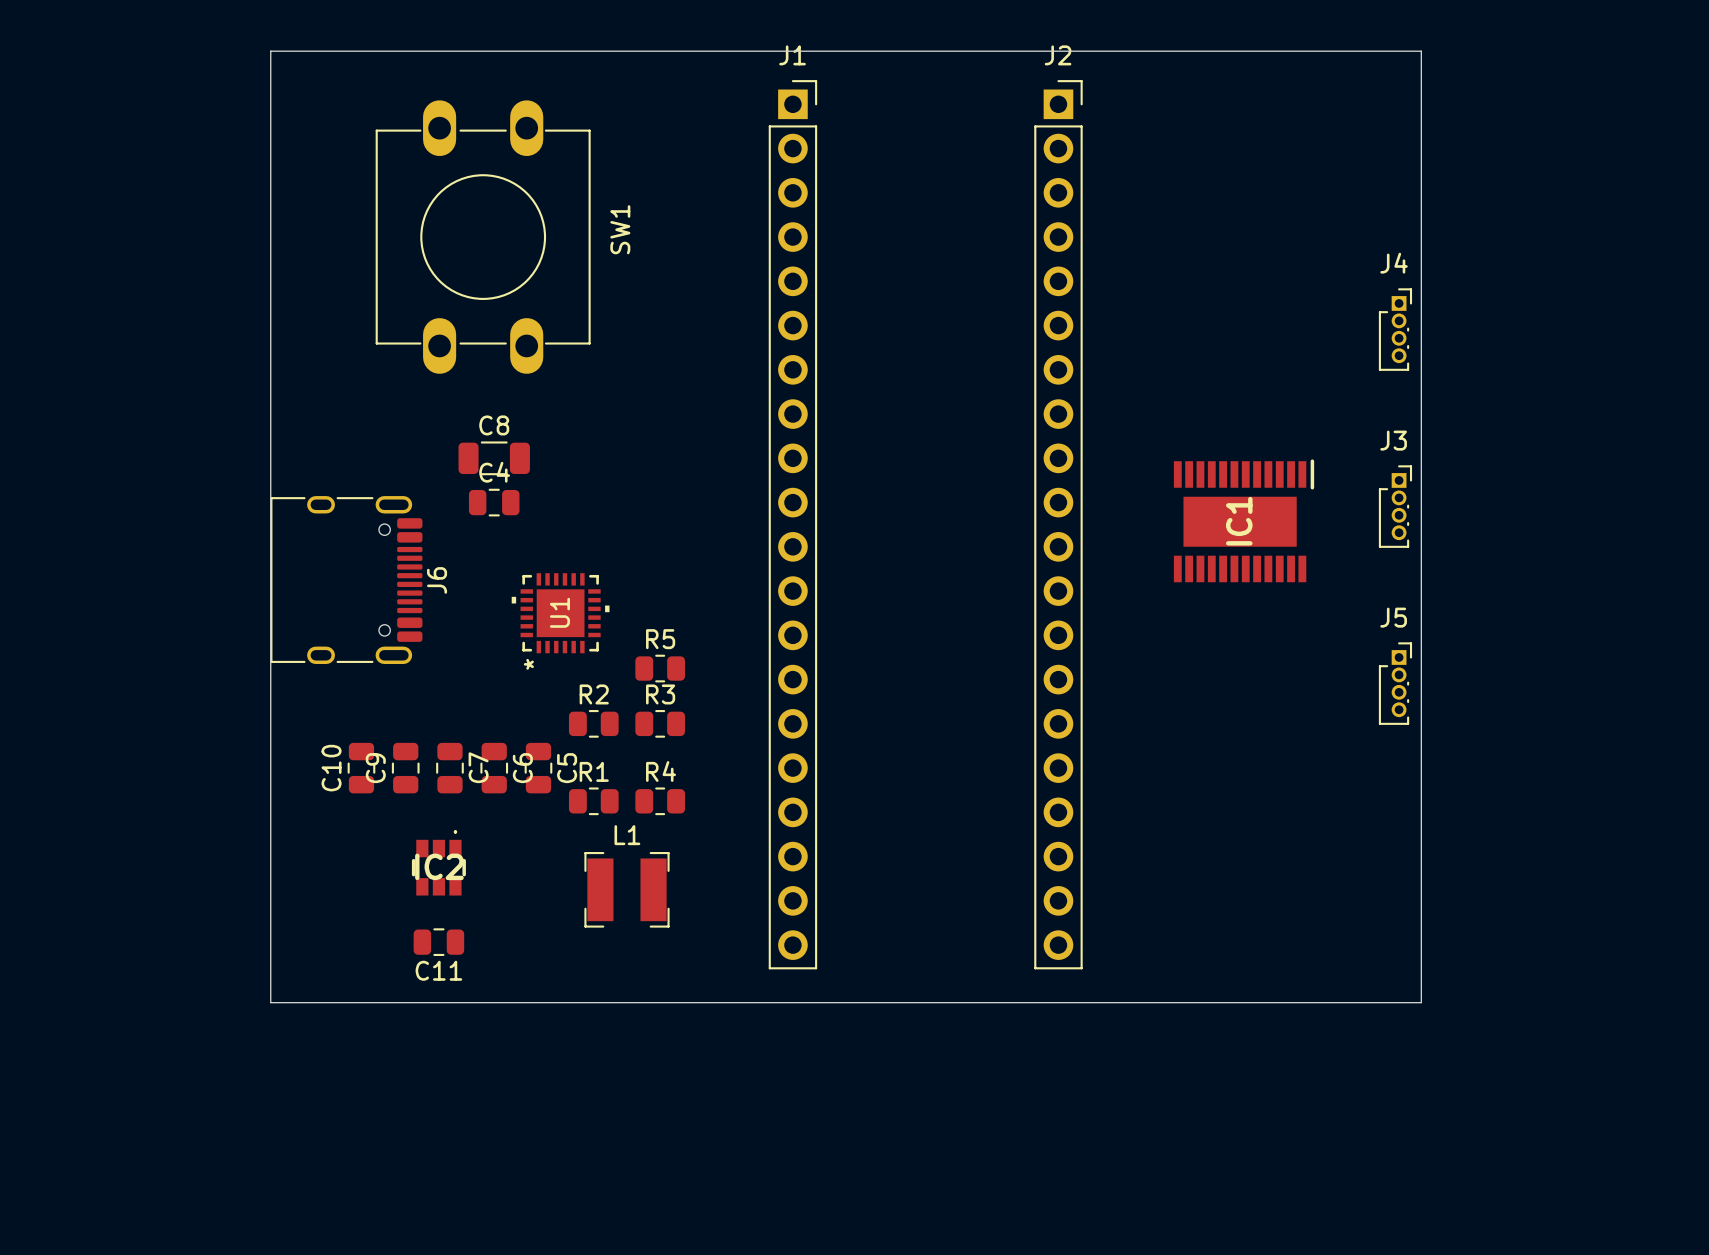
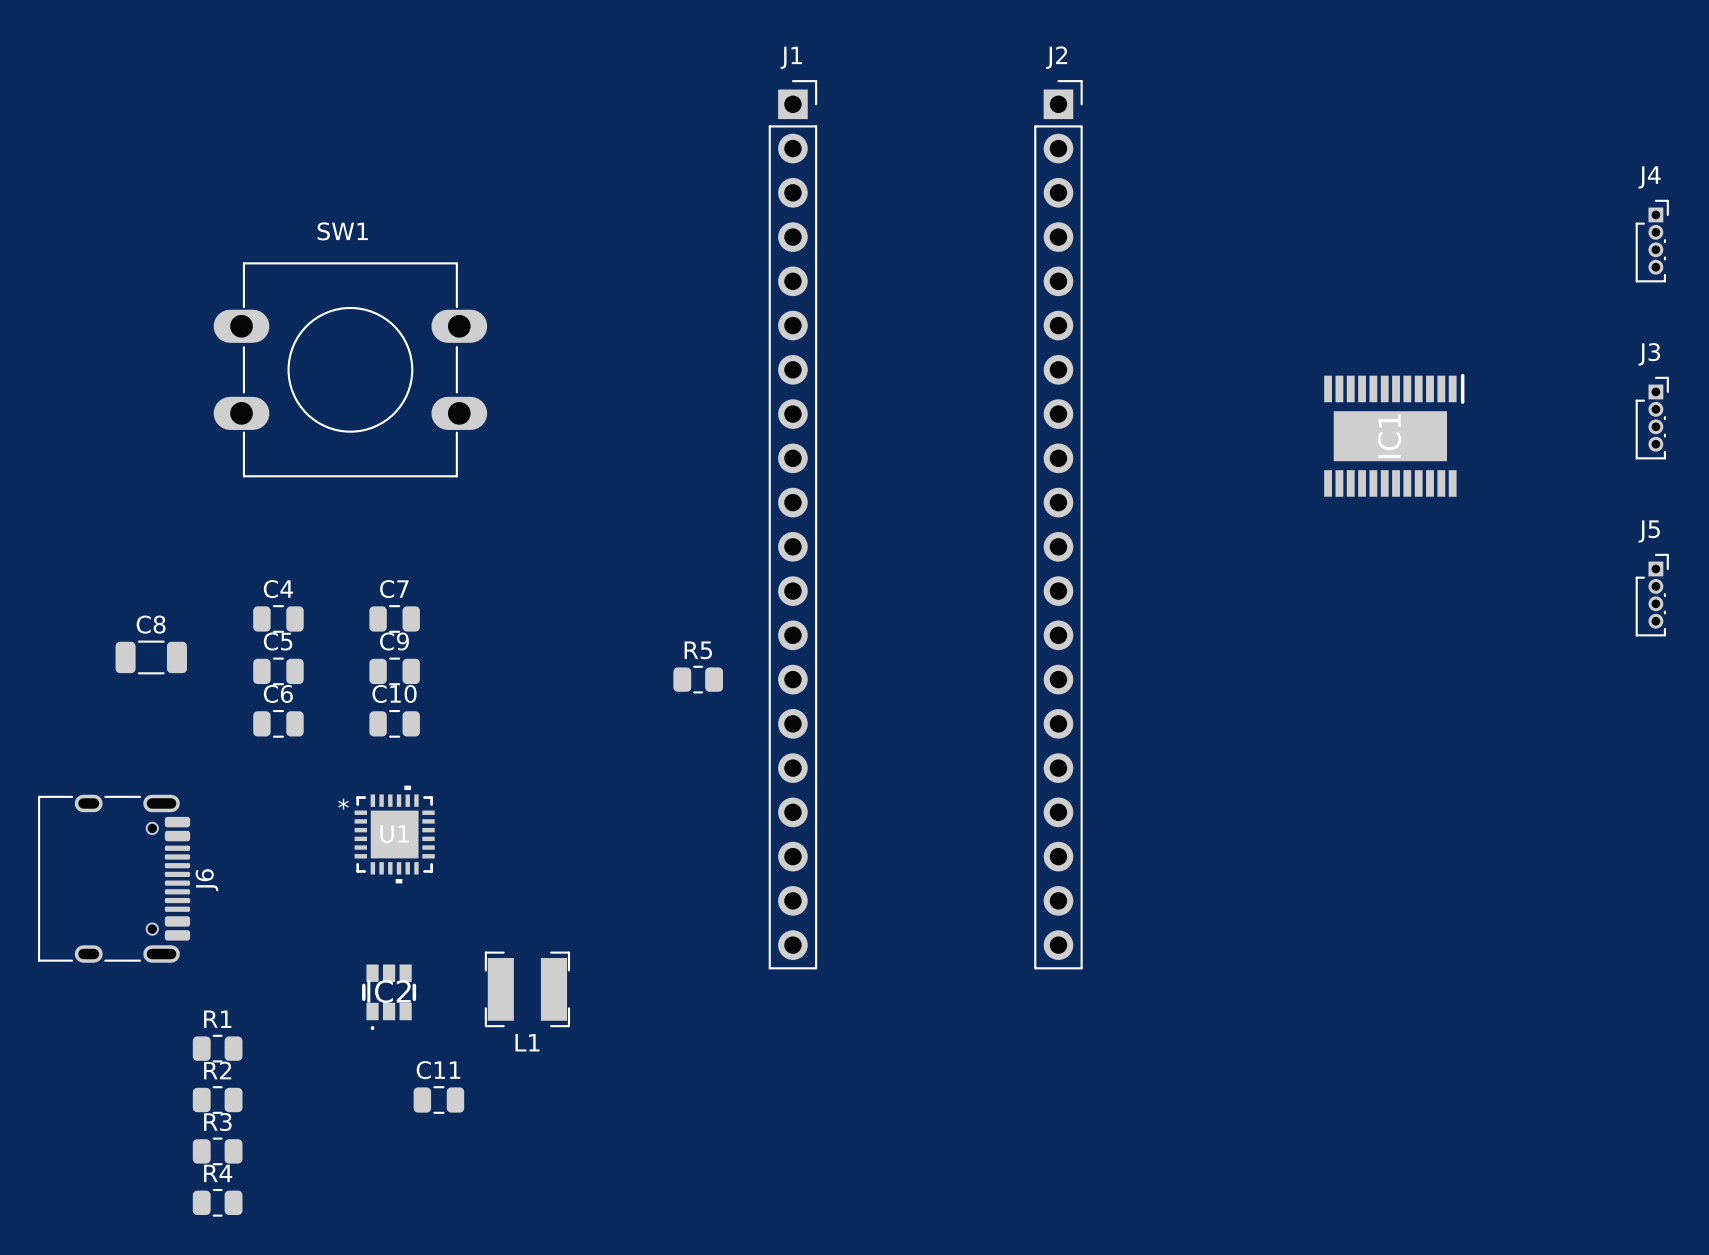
board edge: (270, 51) (1421, 51) (1421, 1002) (270, 1002) (270, 51) -> none
SW1 name position: SW1 (620, 229) -> SW1 (342, 231)
SW1 rotation: 0° (483, 237) -> 90° clockwise (350, 369)
SW1 position: (483, 237) -> (350, 369)
J4 position: (1395, 329) -> (1652, 241)
C8 position: (494, 458) -> (151, 657)
C4 position: (494, 502) -> (278, 618)
J3 position: (1395, 506) -> (1652, 418)
IC1 position: (1244, 520) -> (1394, 435)
J6 position: (346, 580) -> (114, 878)
U1 rotation: 0° (560, 613) -> 90° clockwise (394, 834)
U1 position: (560, 613) -> (394, 834)
R5 position: (660, 668) -> (698, 679)
J5 position: (1395, 683) -> (1652, 595)
R2 position: (593, 723) -> (217, 1100)
R3 position: (660, 723) -> (217, 1151)
C7 name position: C7 (478, 767) -> C7 (394, 589)
C10 rotation: 0° (361, 768) -> 90° clockwise (394, 723)
C10 position: (361, 768) -> (394, 723)
C9 rotation: 0° (405, 768) -> 90° clockwise (394, 671)
C9 position: (405, 768) -> (394, 671)
C7 rotation: 0° (449, 768) -> 90° clockwise (394, 618)
C7 position: (449, 768) -> (394, 618)
C6 rotation: 0° (494, 768) -> 90° clockwise (278, 723)
C6 position: (494, 768) -> (278, 723)
C6 name position: C6 (522, 768) -> C6 (278, 693)
C5 rotation: 0° (538, 768) -> 90° clockwise (278, 671)
C5 position: (538, 768) -> (278, 671)
C5 name position: C5 (567, 768) -> C5 (278, 641)
R1 position: (593, 801) -> (217, 1048)
R4 position: (660, 801) -> (217, 1202)
L1 name position: L1 (627, 835) -> L1 (527, 1042)
IC2 rotation: 0° (438, 862) -> 180° (389, 997)
IC2 position: (438, 862) -> (389, 997)
L1 position: (626, 889) -> (527, 989)
C11 position: (438, 942) -> (438, 1100)
C11 name position: C11 (438, 970) -> C11 (438, 1070)

